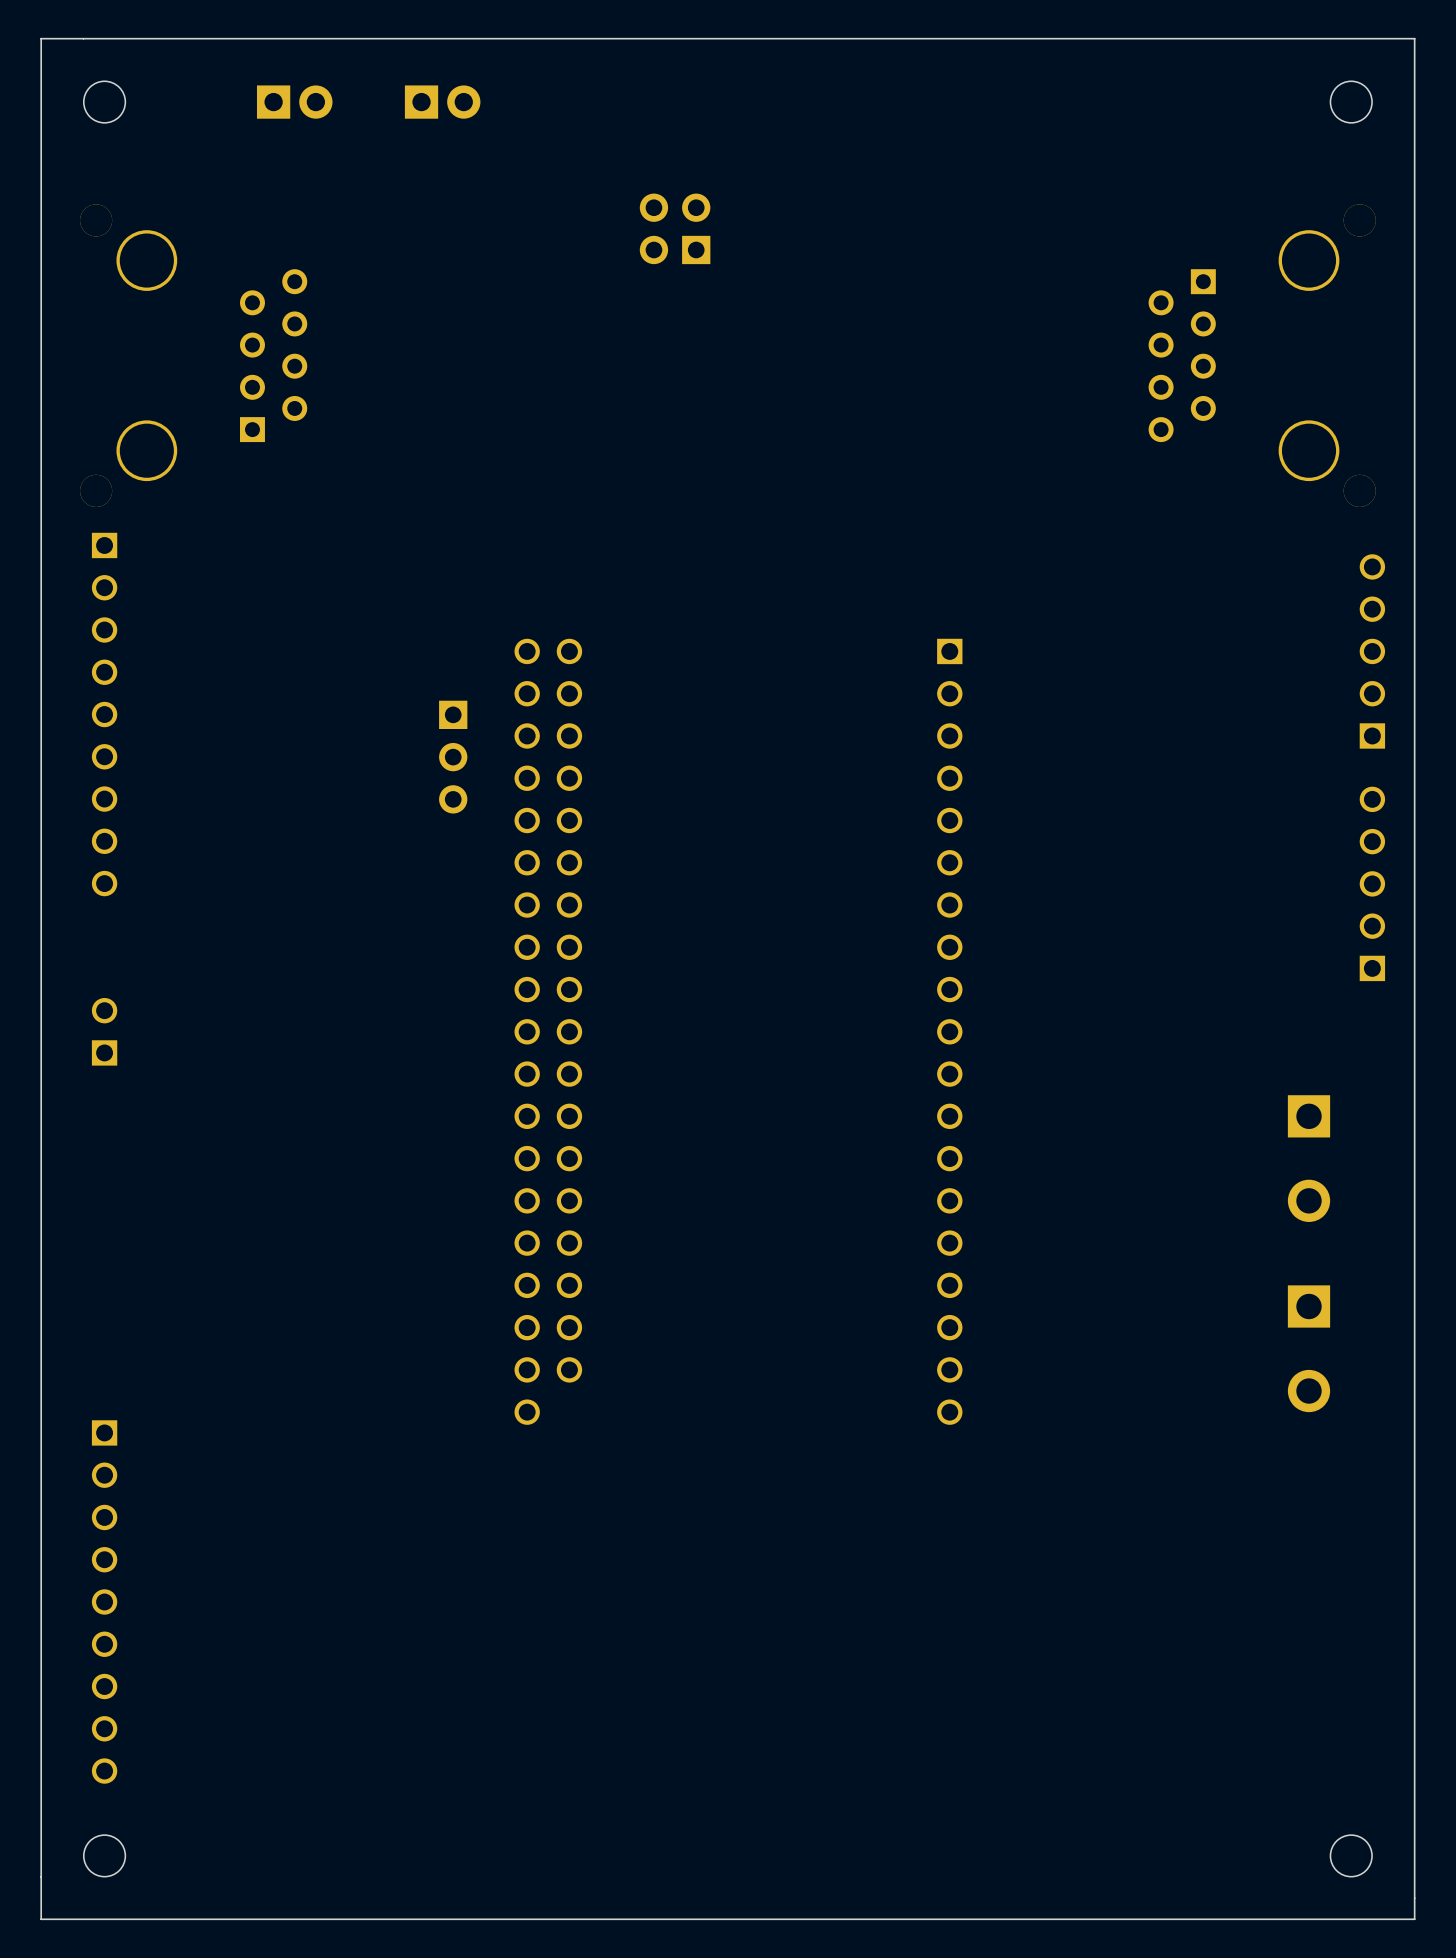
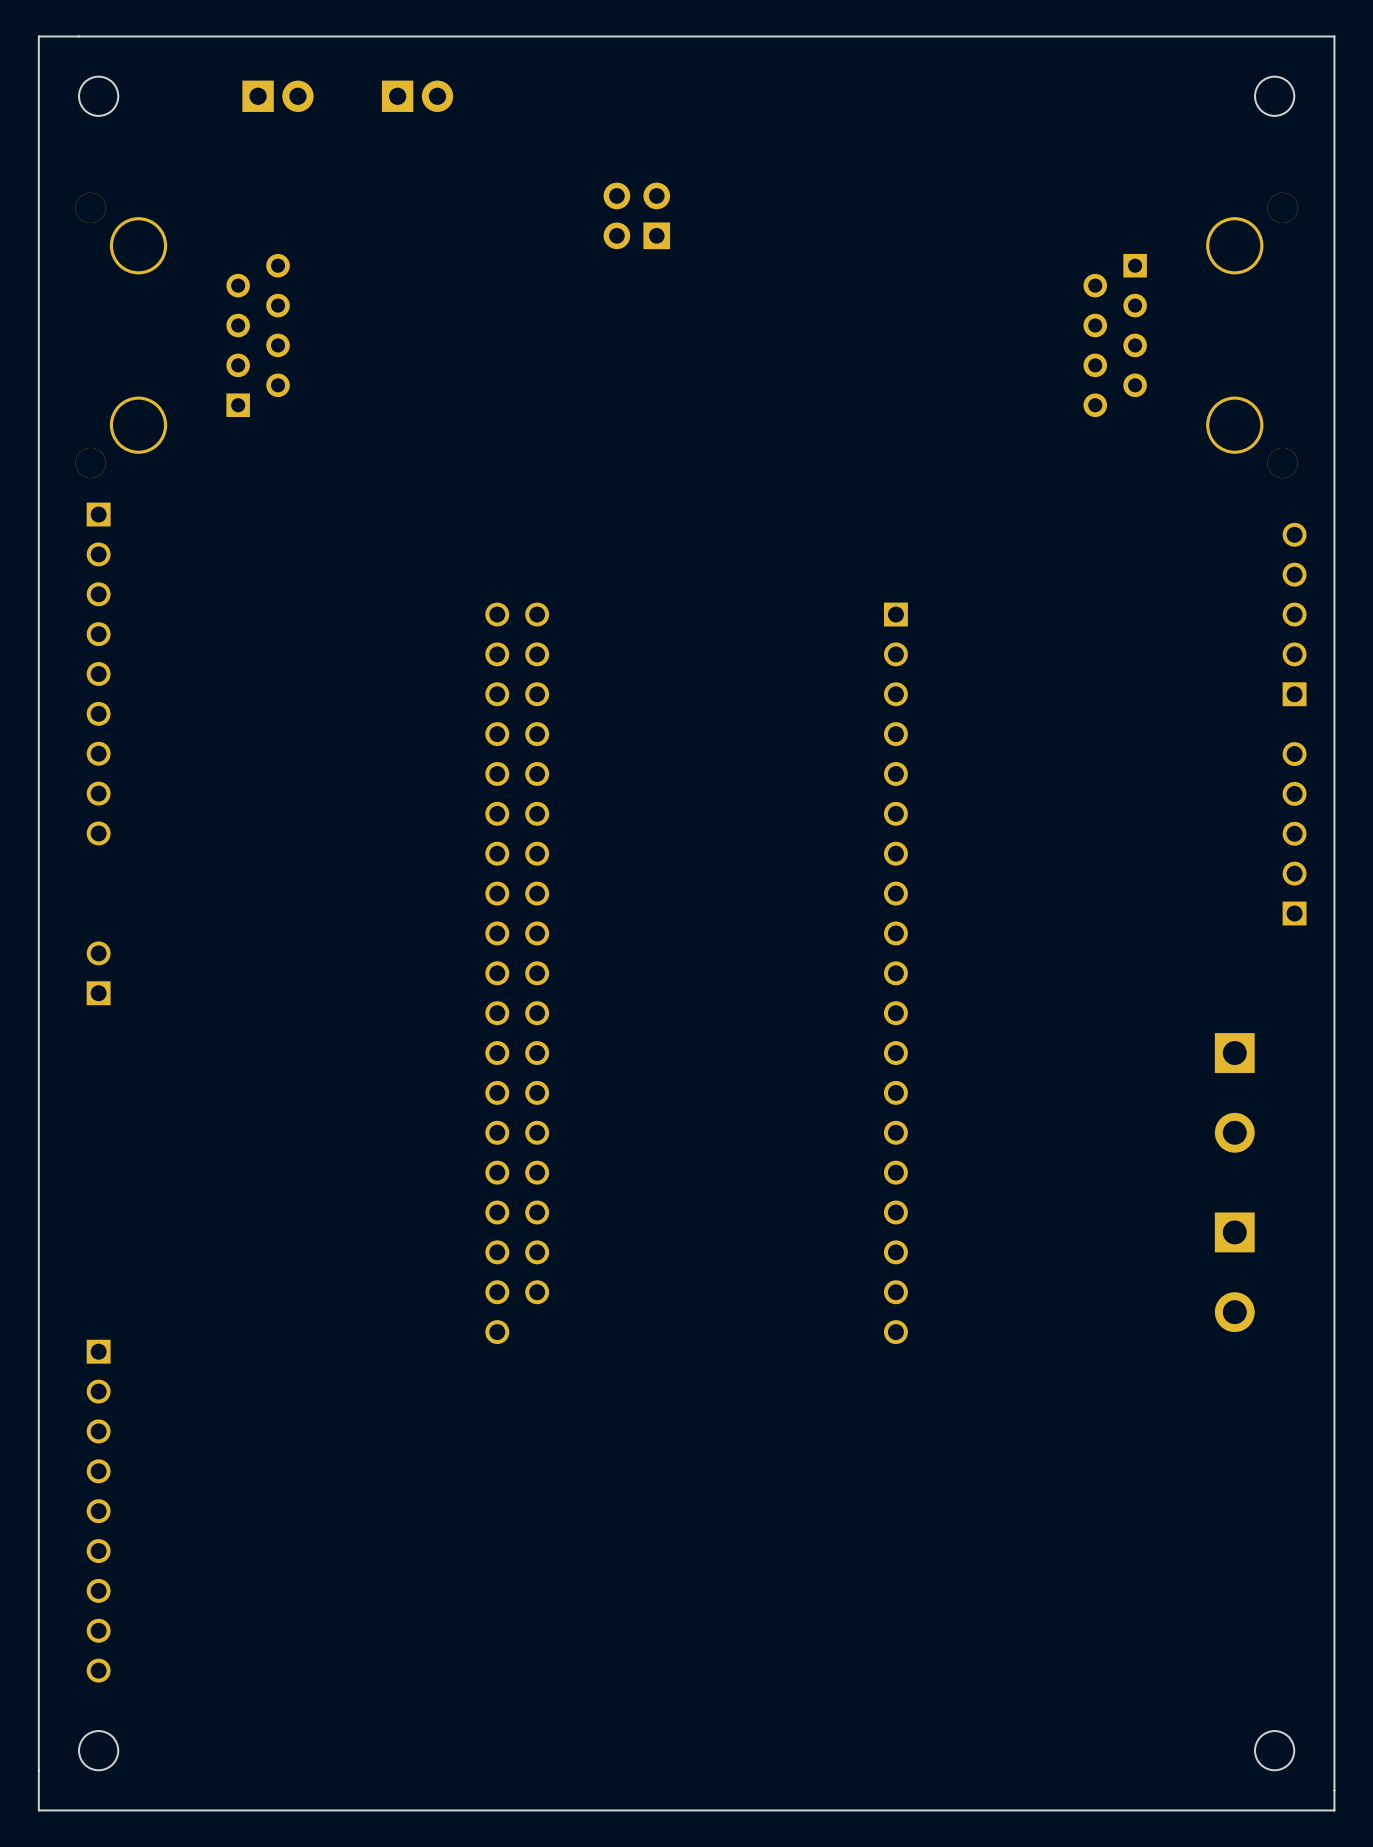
part: (453, 757) -> none

